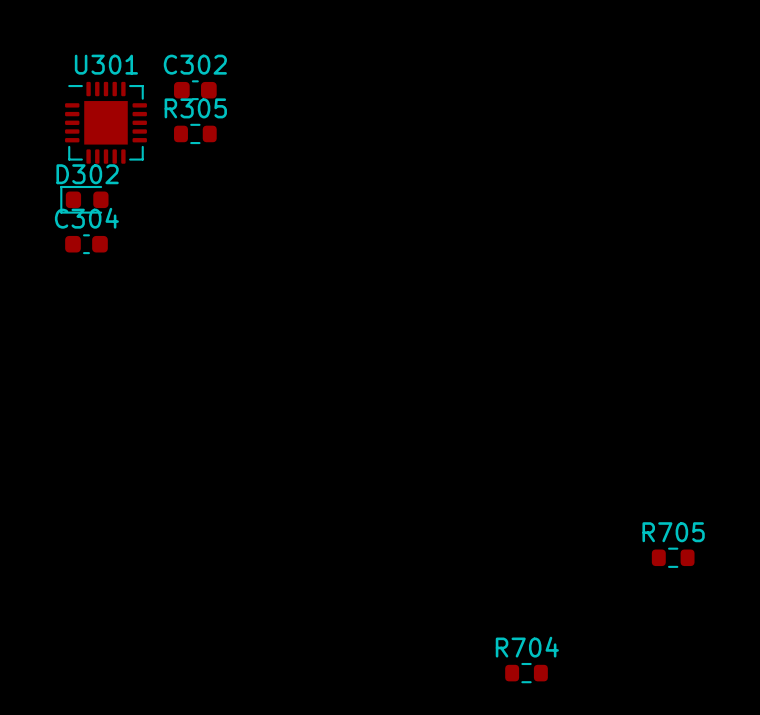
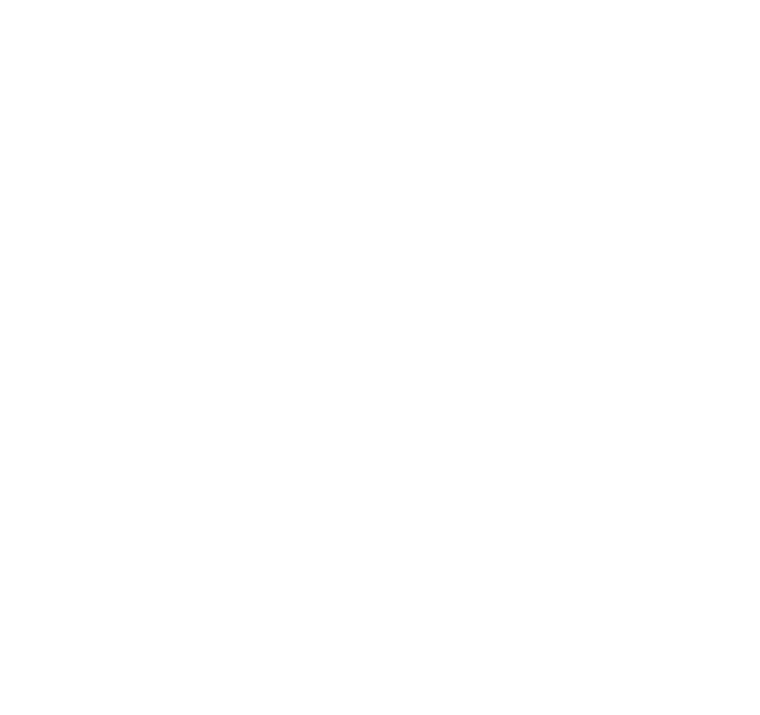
C302: (195, 90) -> none
U301: (105, 122) -> none
R305: (195, 133) -> none
D302: (84, 199) -> none
C304: (86, 244) -> none
R705: (673, 557) -> none
R704: (526, 673) -> none

